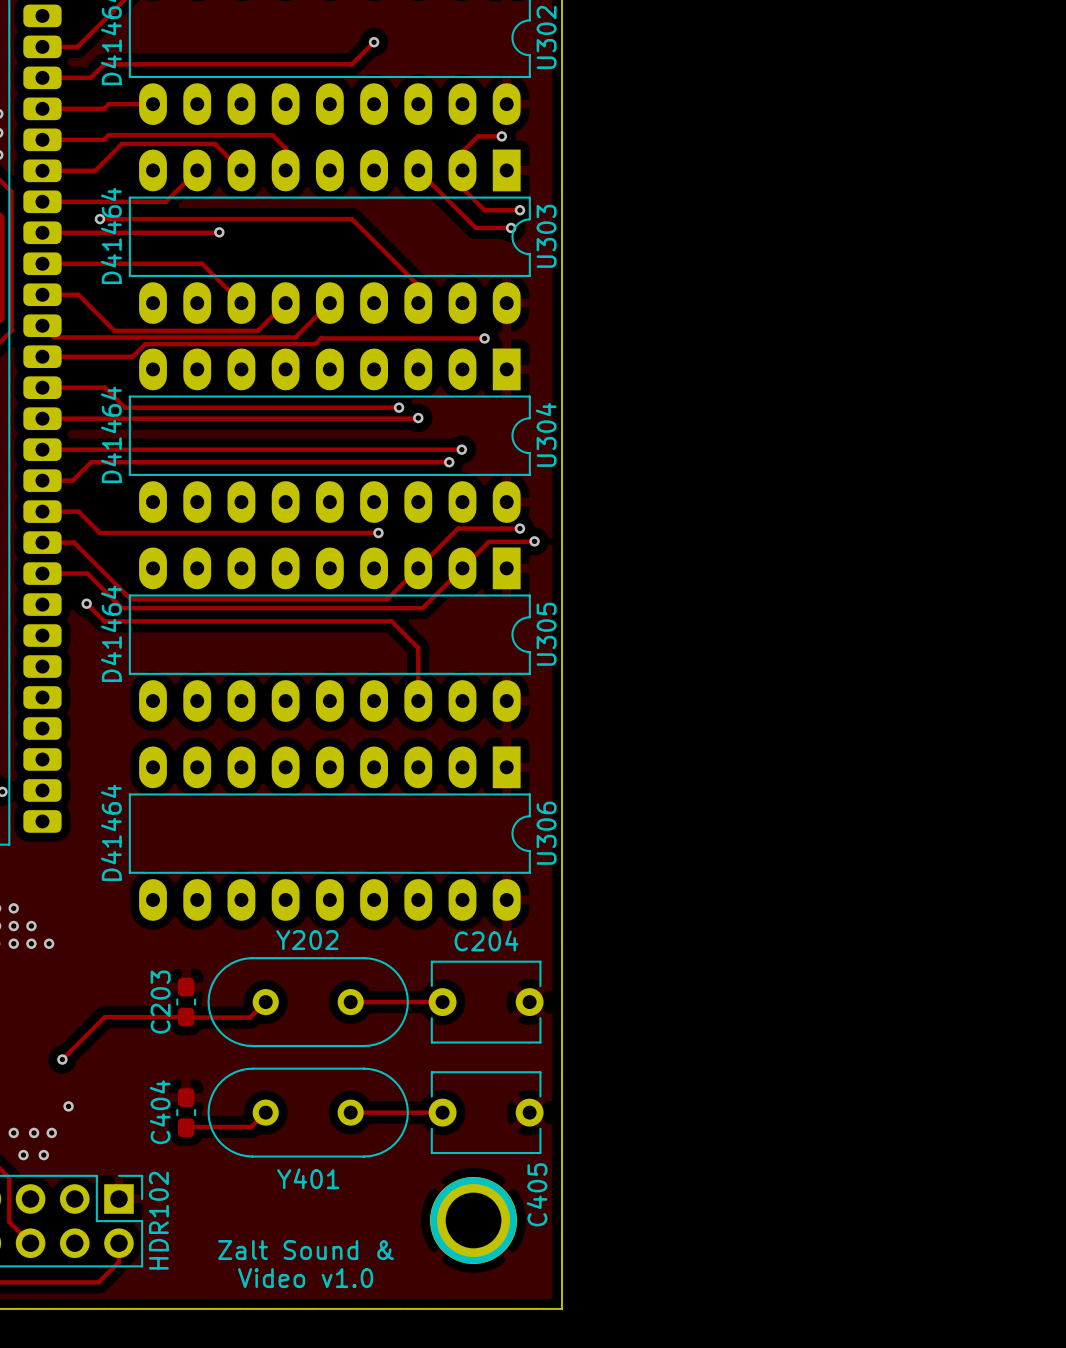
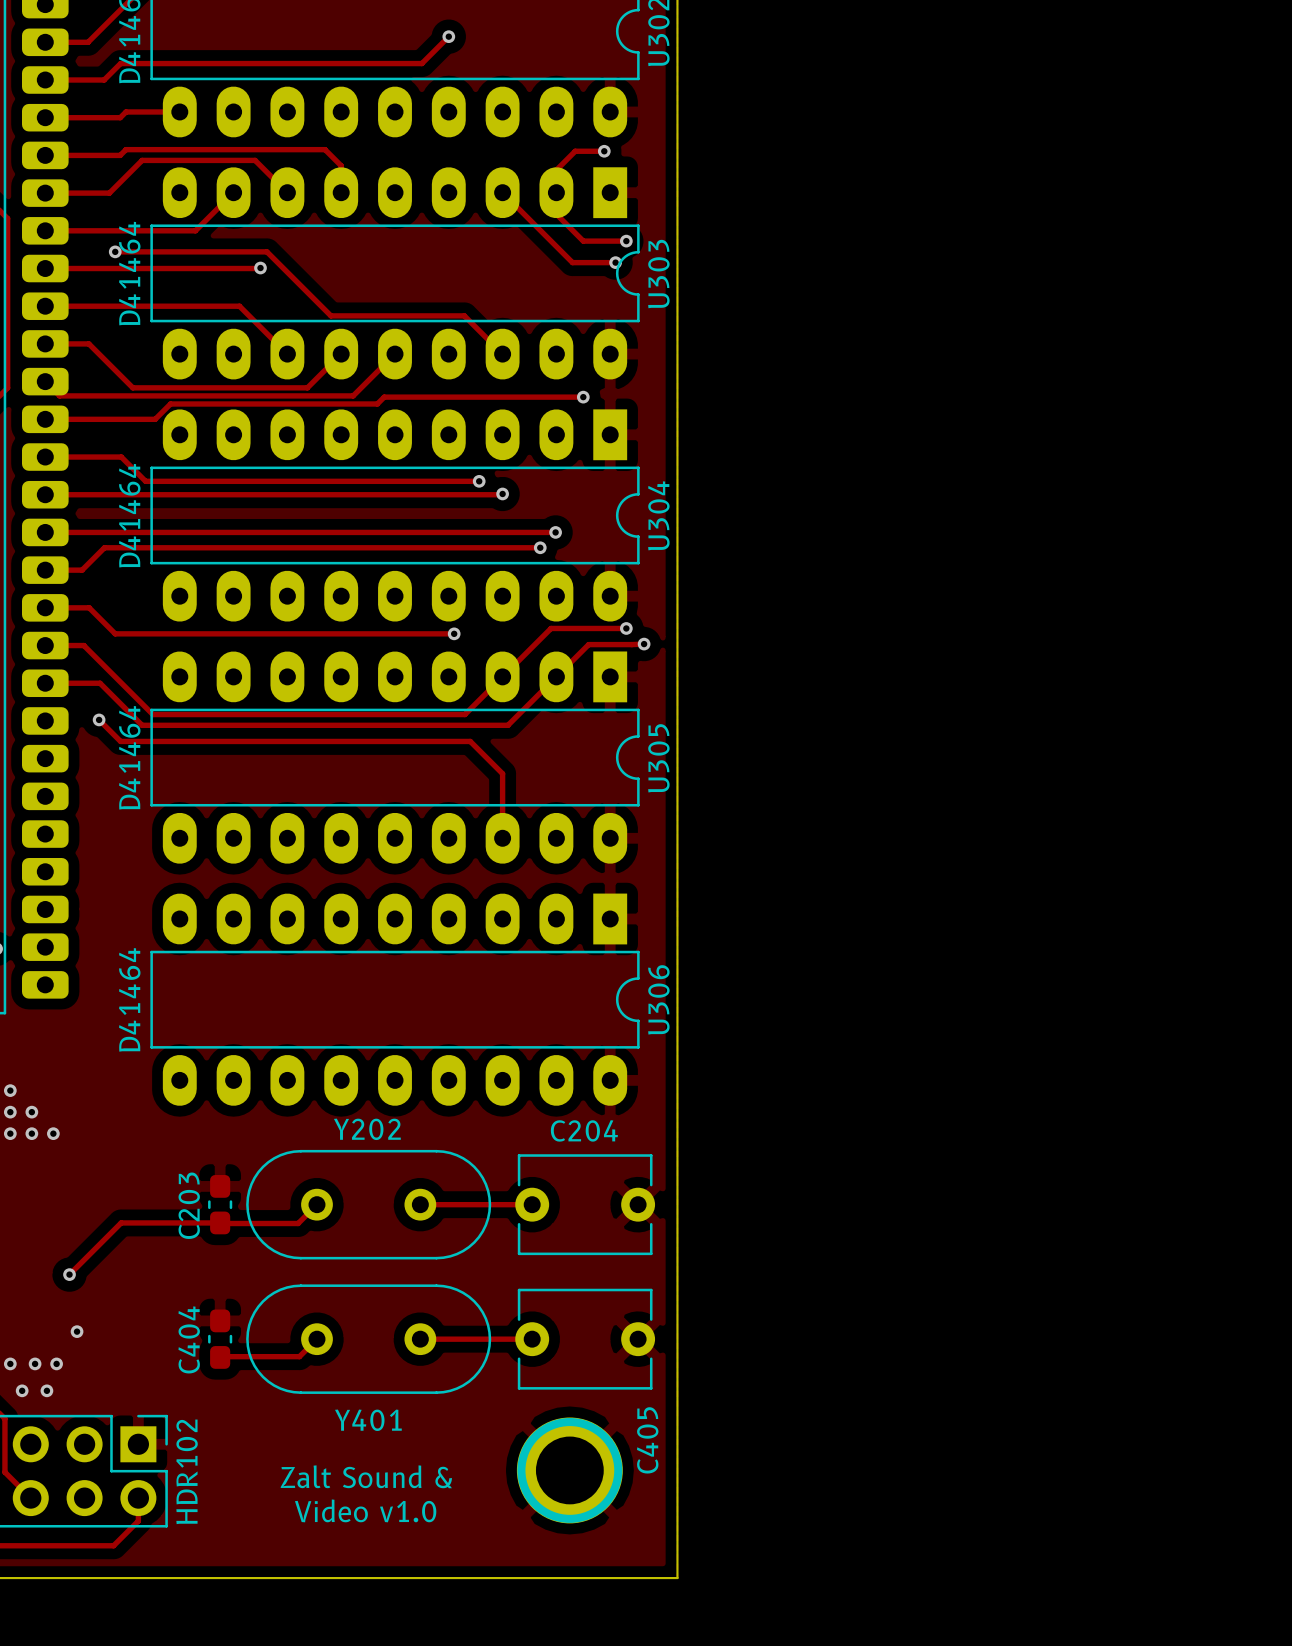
track: (224, 219) (351, 219) (418, 285) (418, 303) -> (266, 251) (330, 315) (464, 315) (502, 354)
text: none -> Zalt Sound & (366, 1476)
text: Zalt Sound & (306, 1250) -> Video v1.0 (365, 1510)
text: Video v1.0 (305, 1278) -> none

